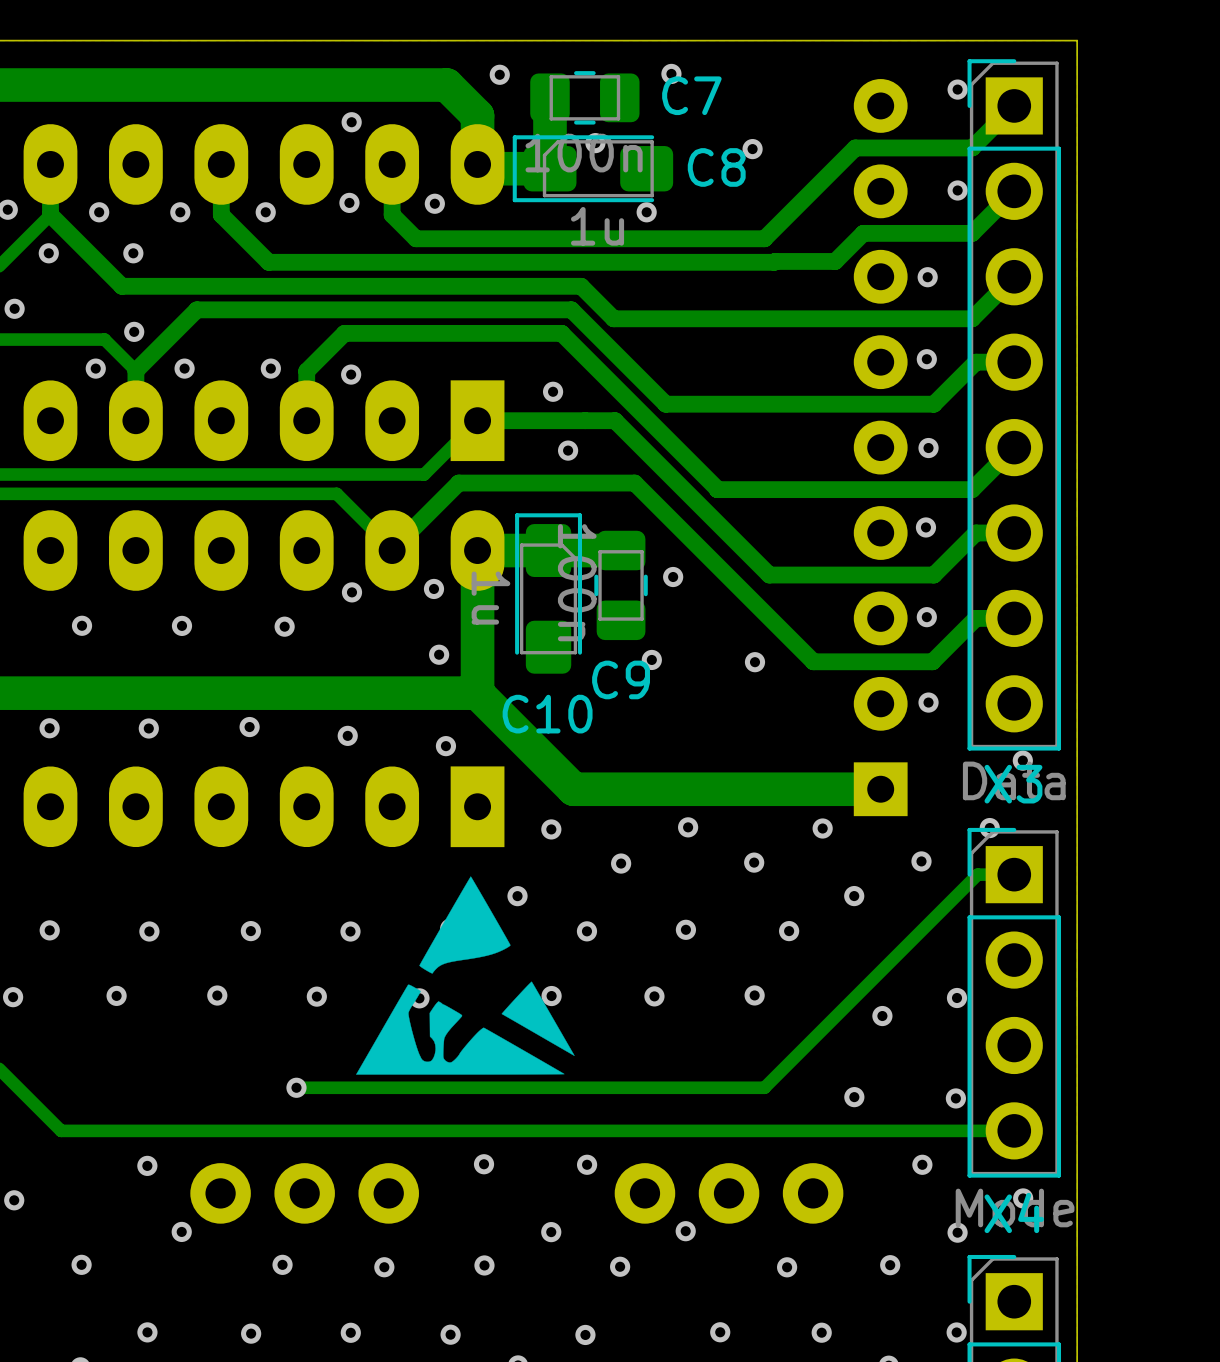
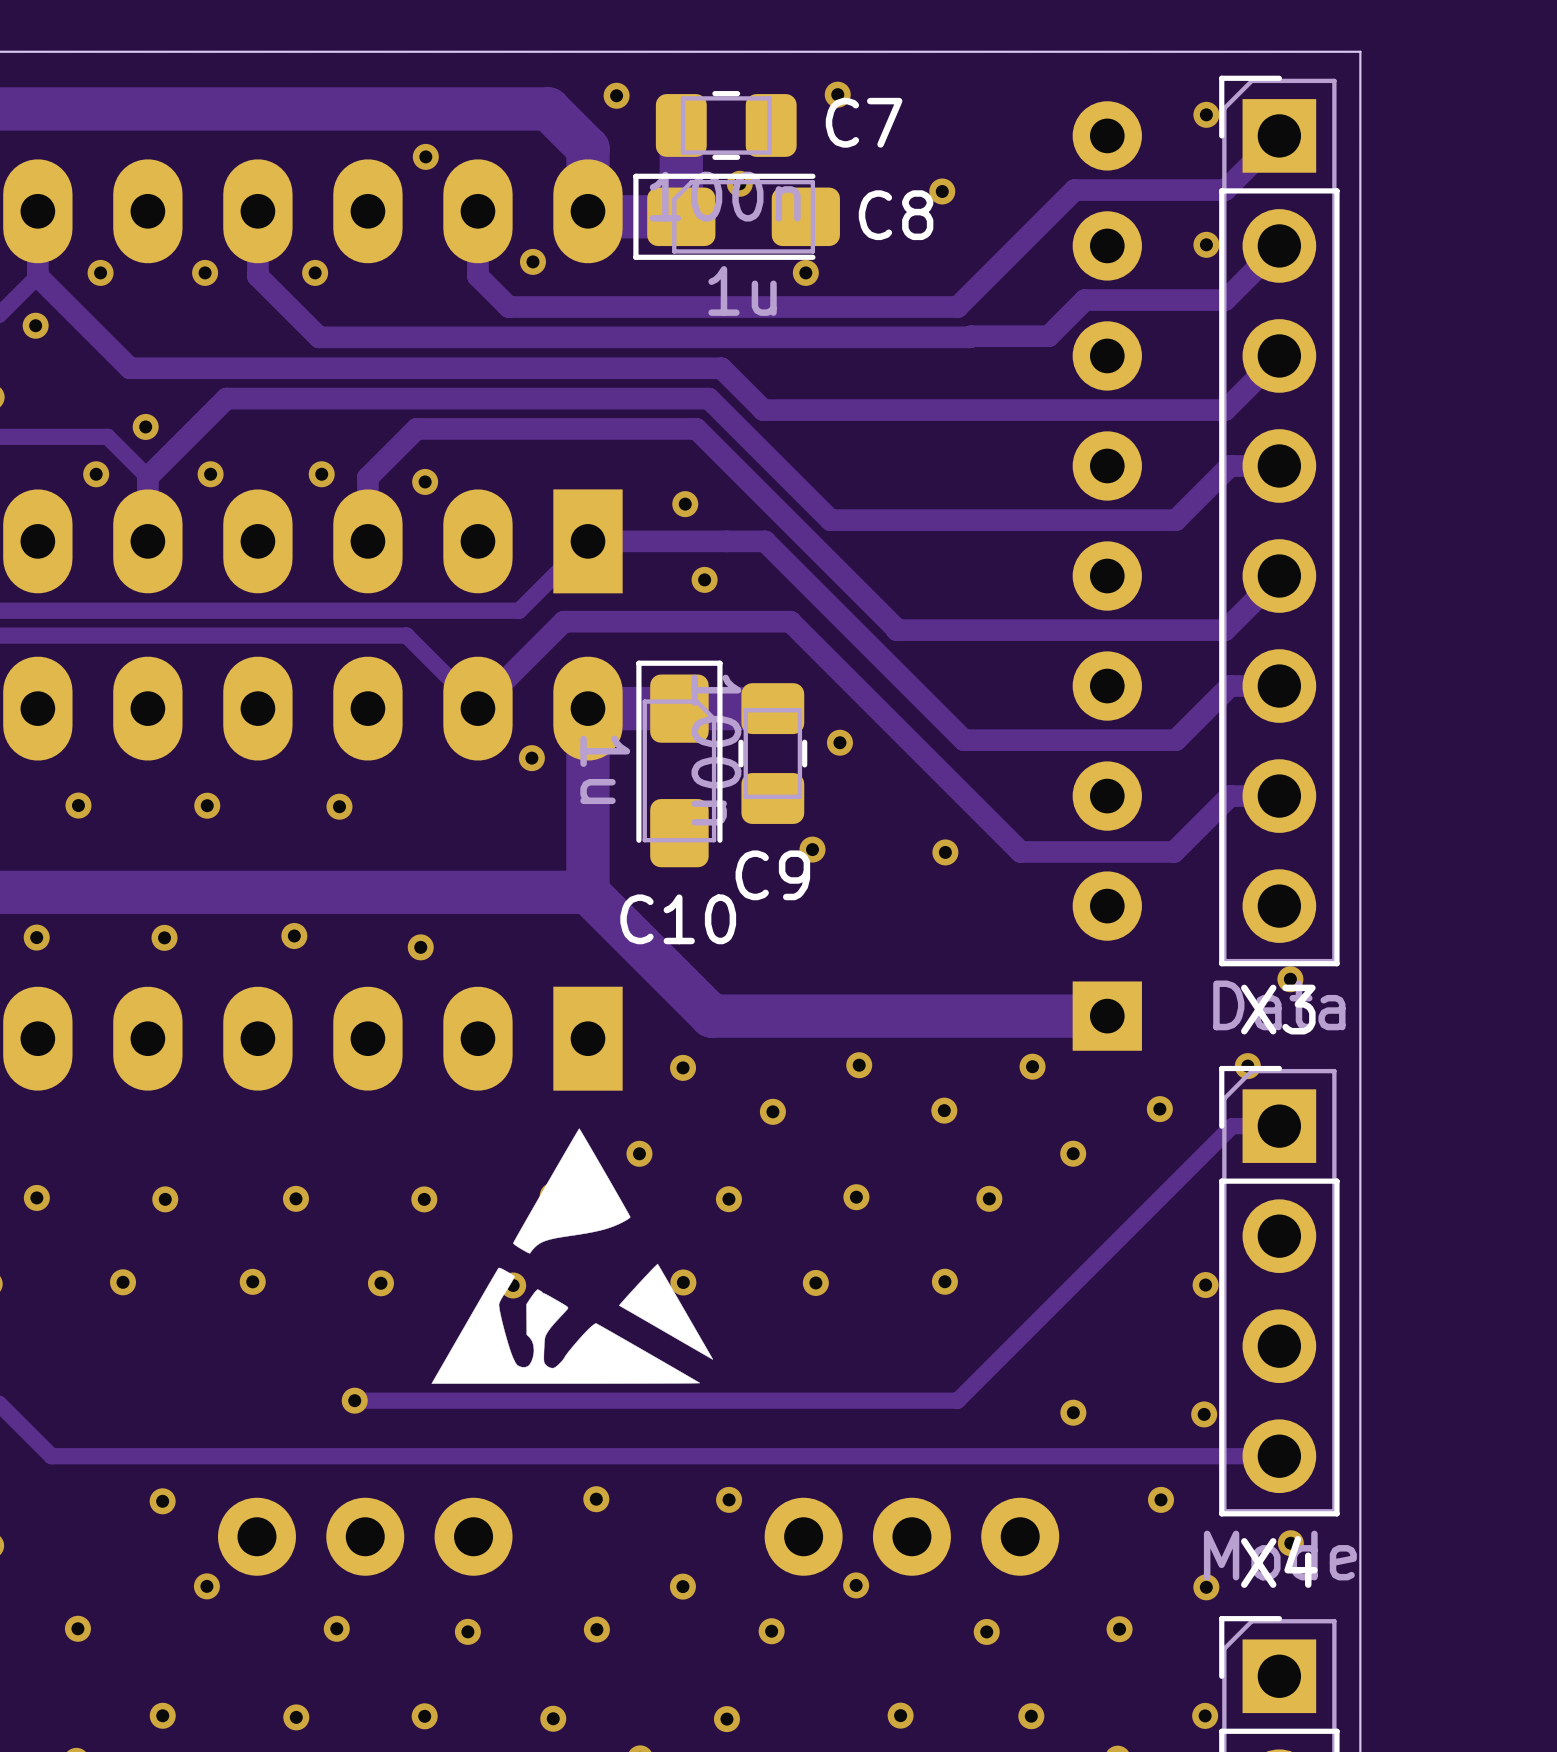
via: (349, 202) -> none
via: (133, 253) -> none
via: (927, 277) -> none
via: (926, 359) -> none
via: (928, 448) -> none
via: (925, 527) -> none
via: (352, 592) -> none
via: (926, 617) -> none
via: (439, 654) -> none
via: (928, 702) -> none
via: (445, 746) -> none
via: (882, 1016) -> none

